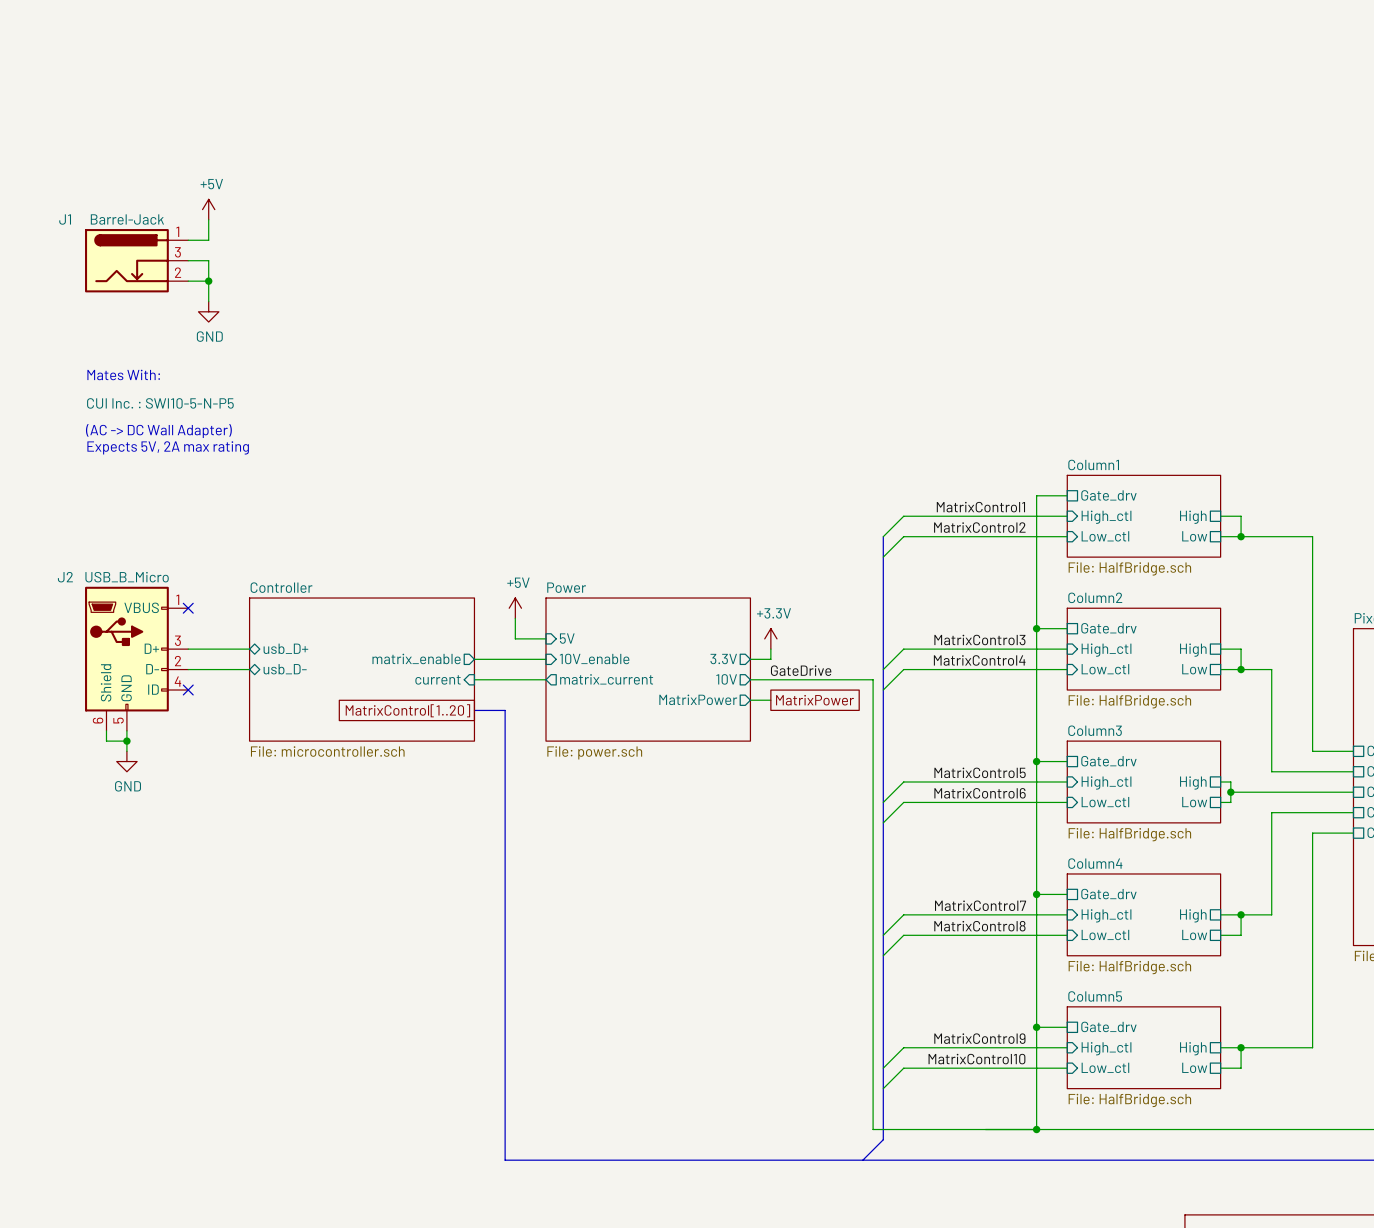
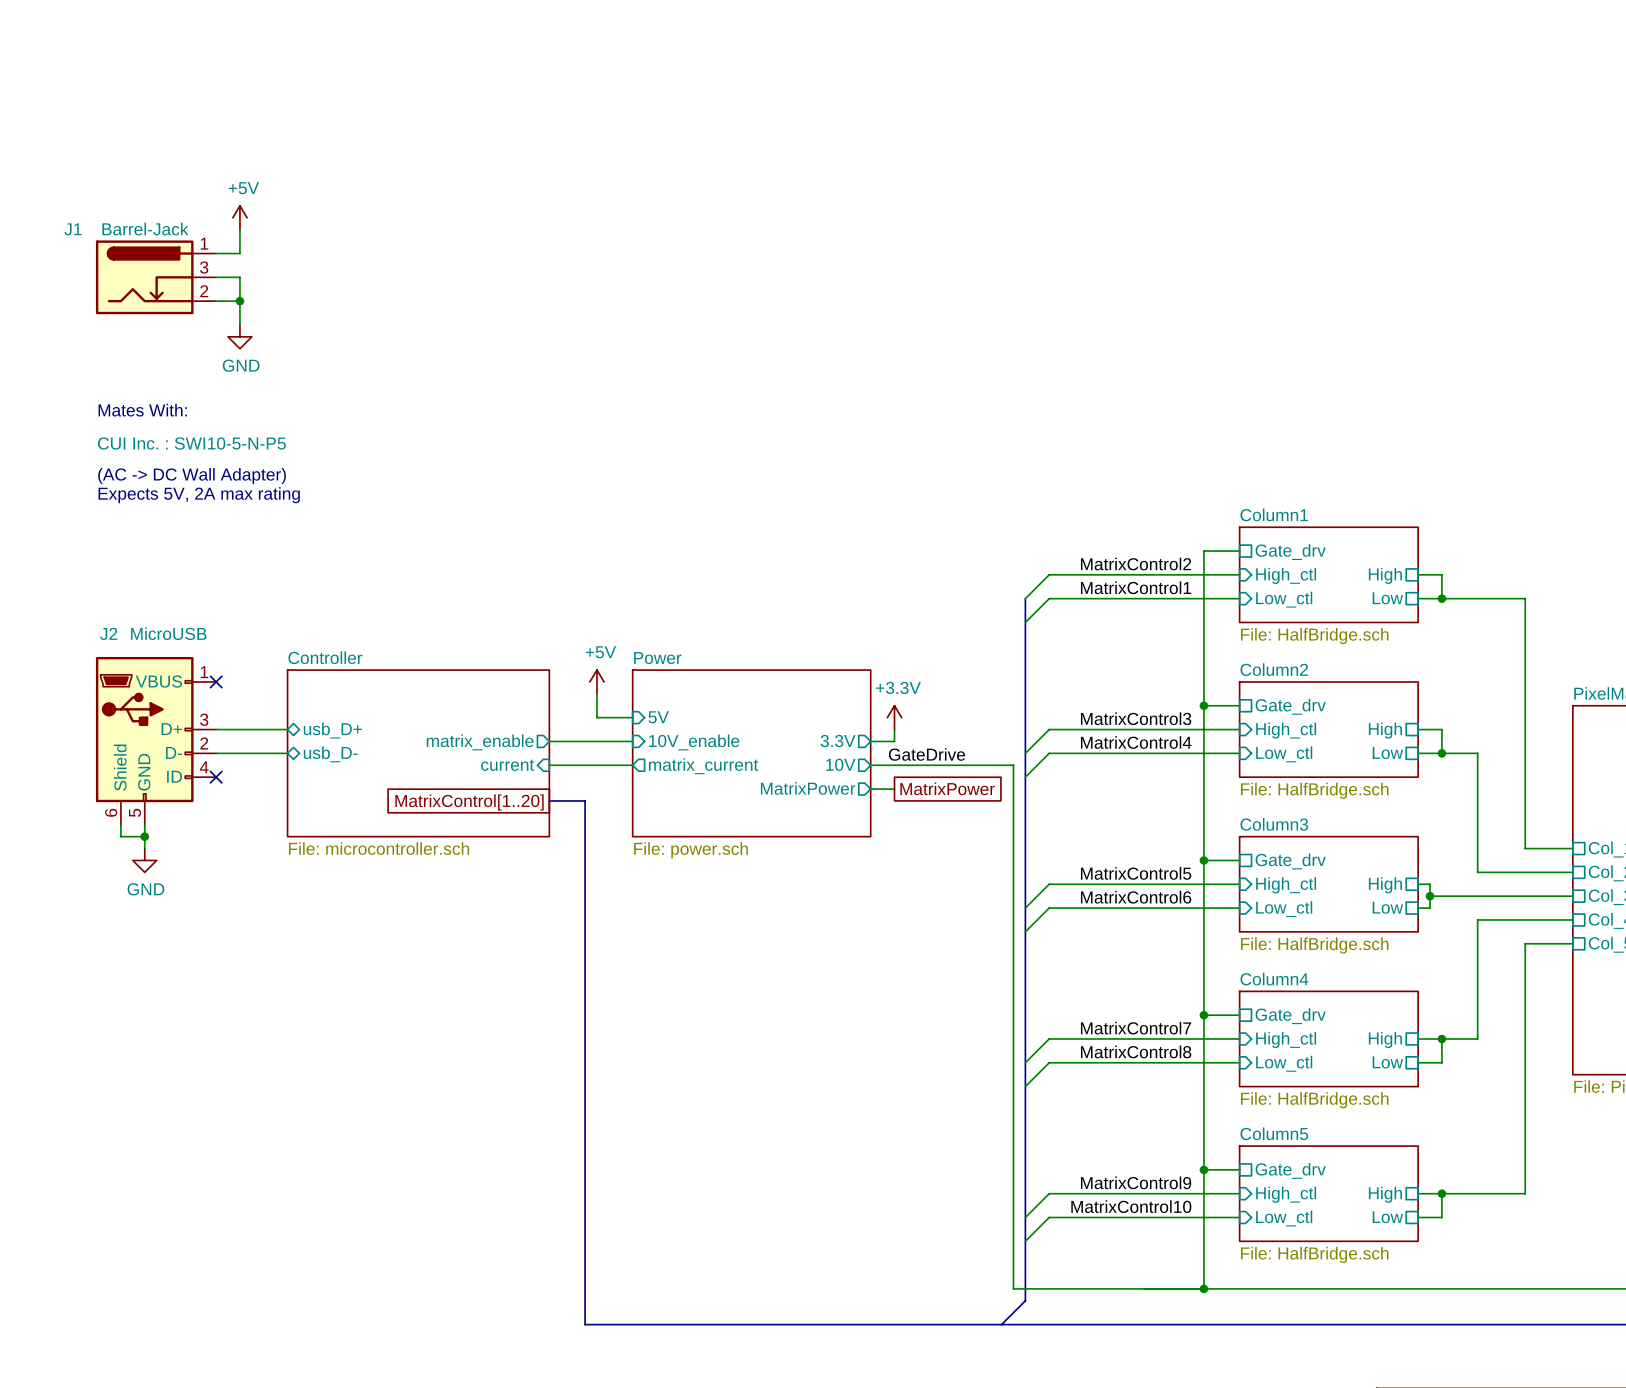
label: MatrixControl1 (980, 507) -> MatrixControl2 (1136, 564)
label: MatrixControl2 (979, 527) -> MatrixControl1 (1136, 587)
J2 name position: J2 (65, 577) -> J2 (108, 633)
J2 value: USB_B_Micro (127, 577) -> MicroUSB (168, 633)

